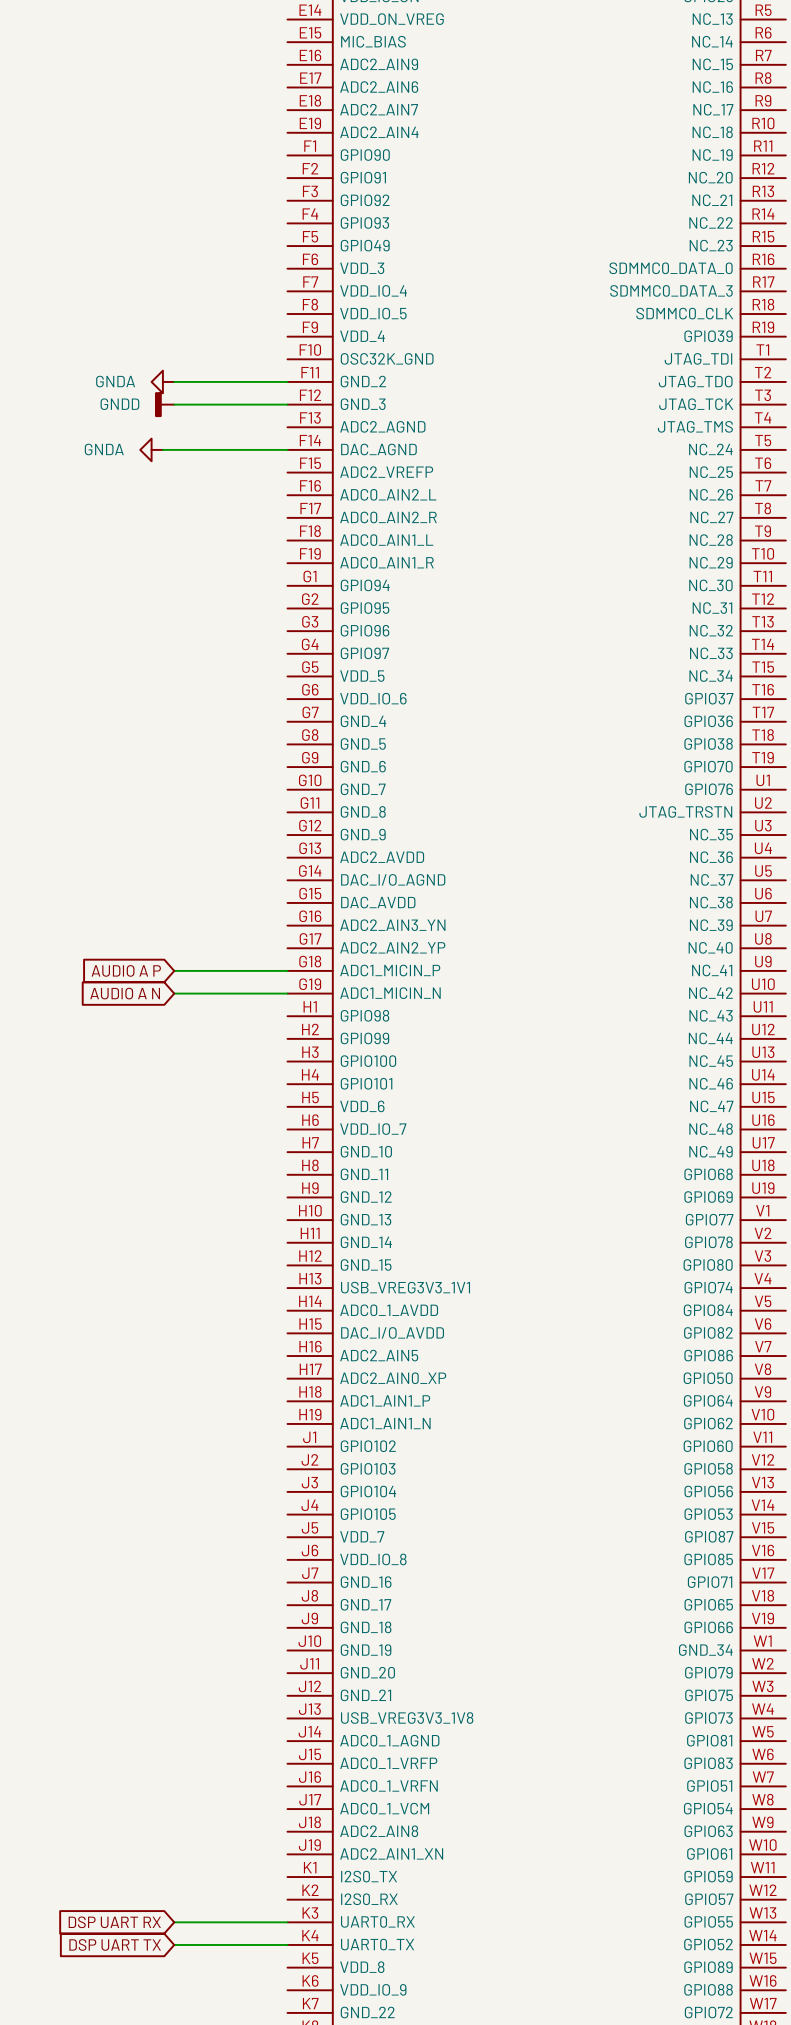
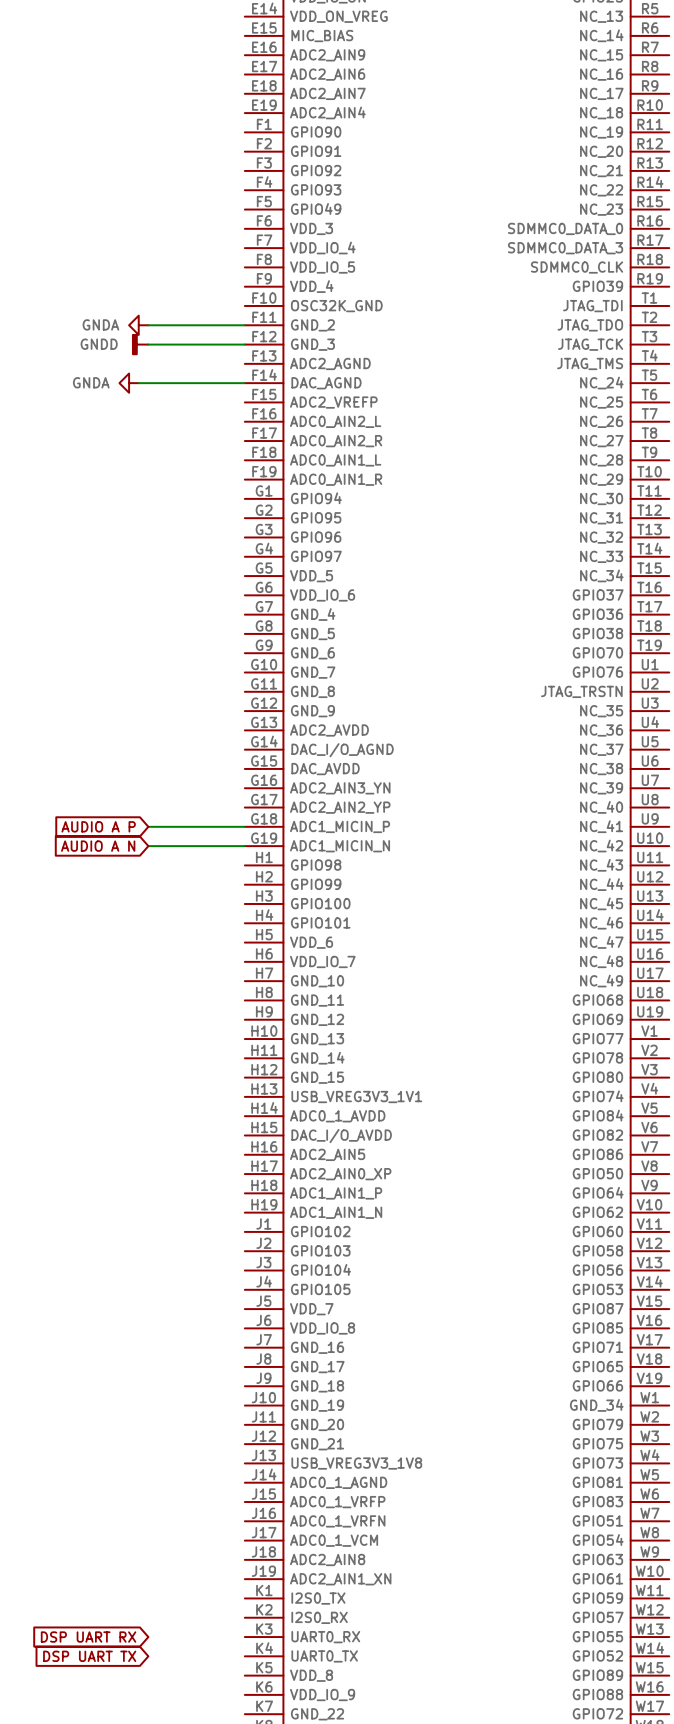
wire: (174, 1922) (287, 1922) -> none
wire: (174, 1944) (287, 1944) -> none

